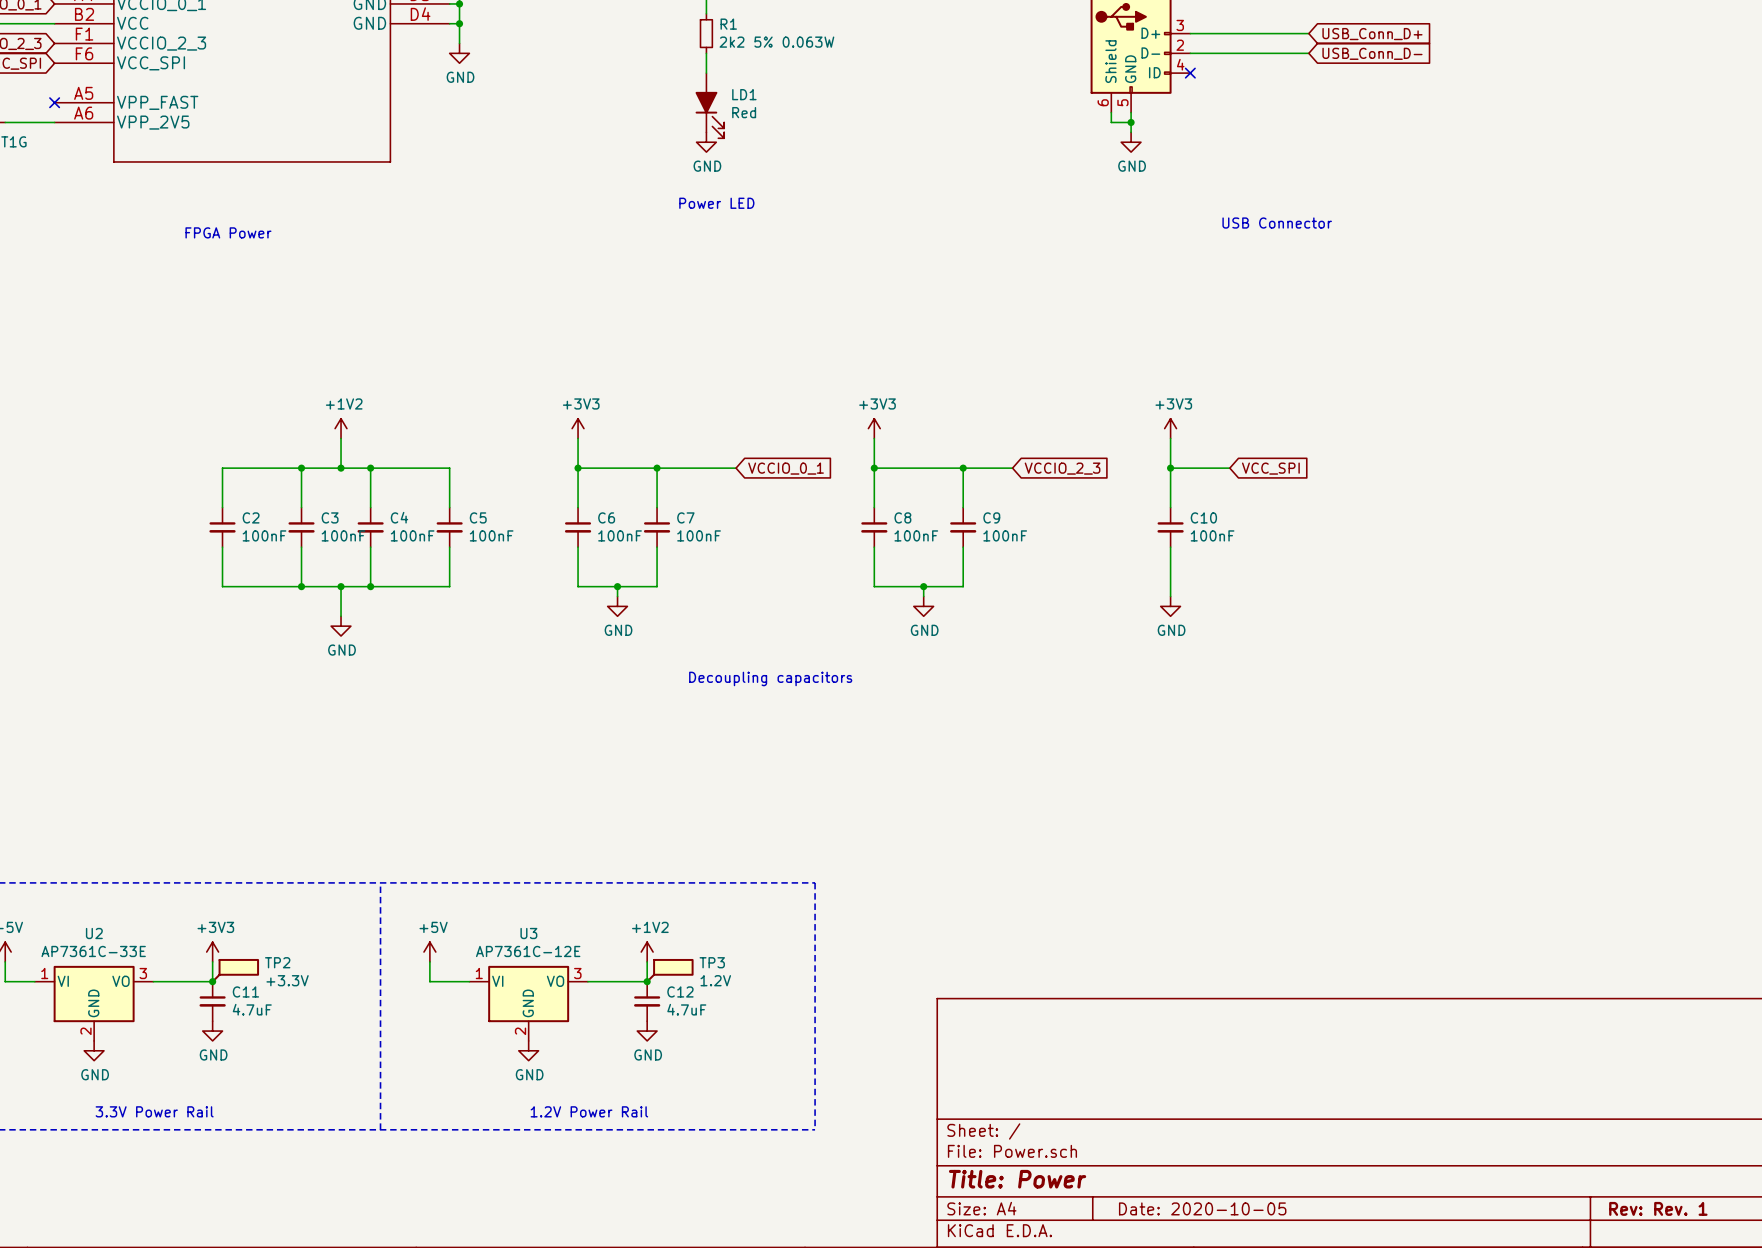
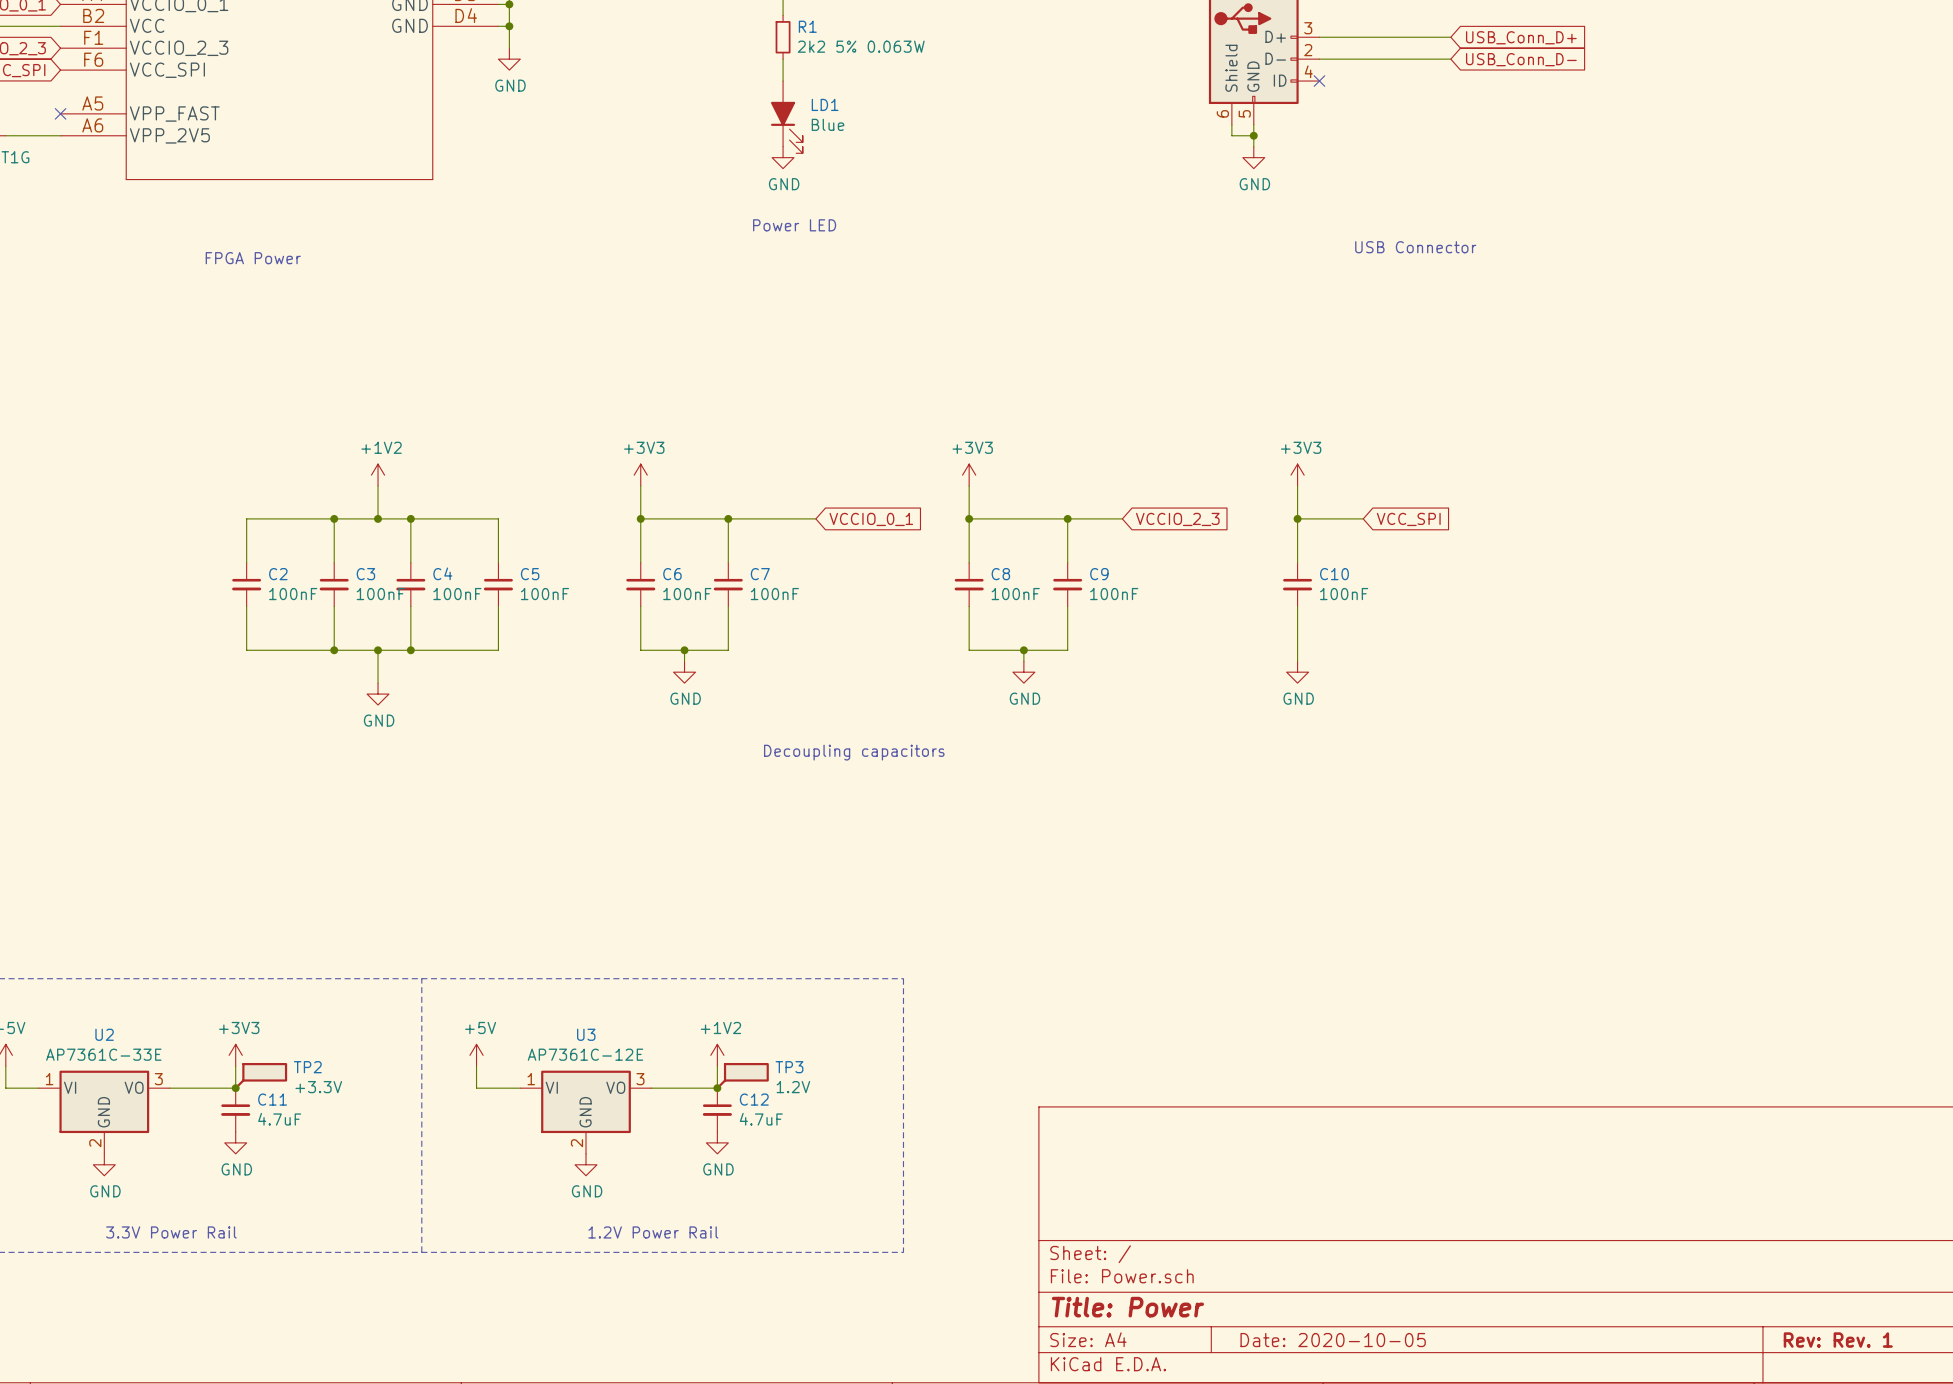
LD1 value: Red (744, 112) -> Blue (828, 124)

